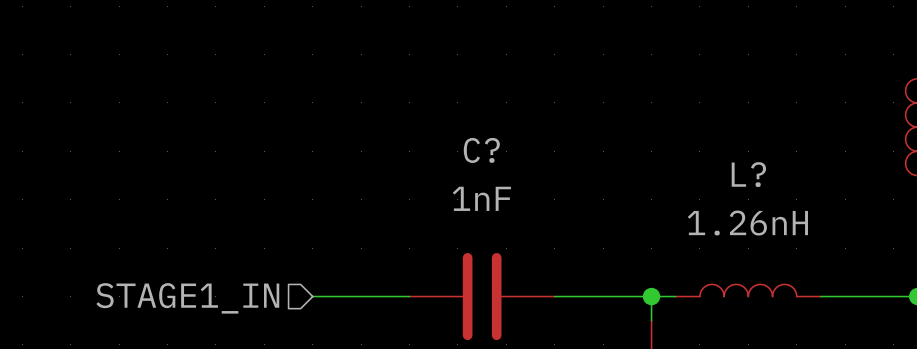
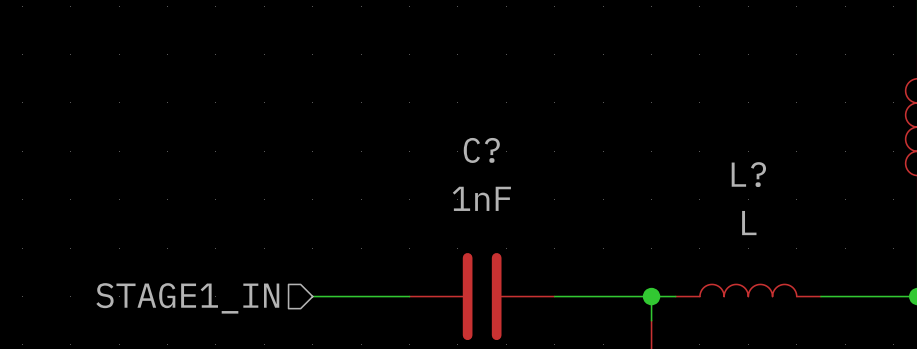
L? value: 1.26nH (747, 223) -> L (749, 223)

